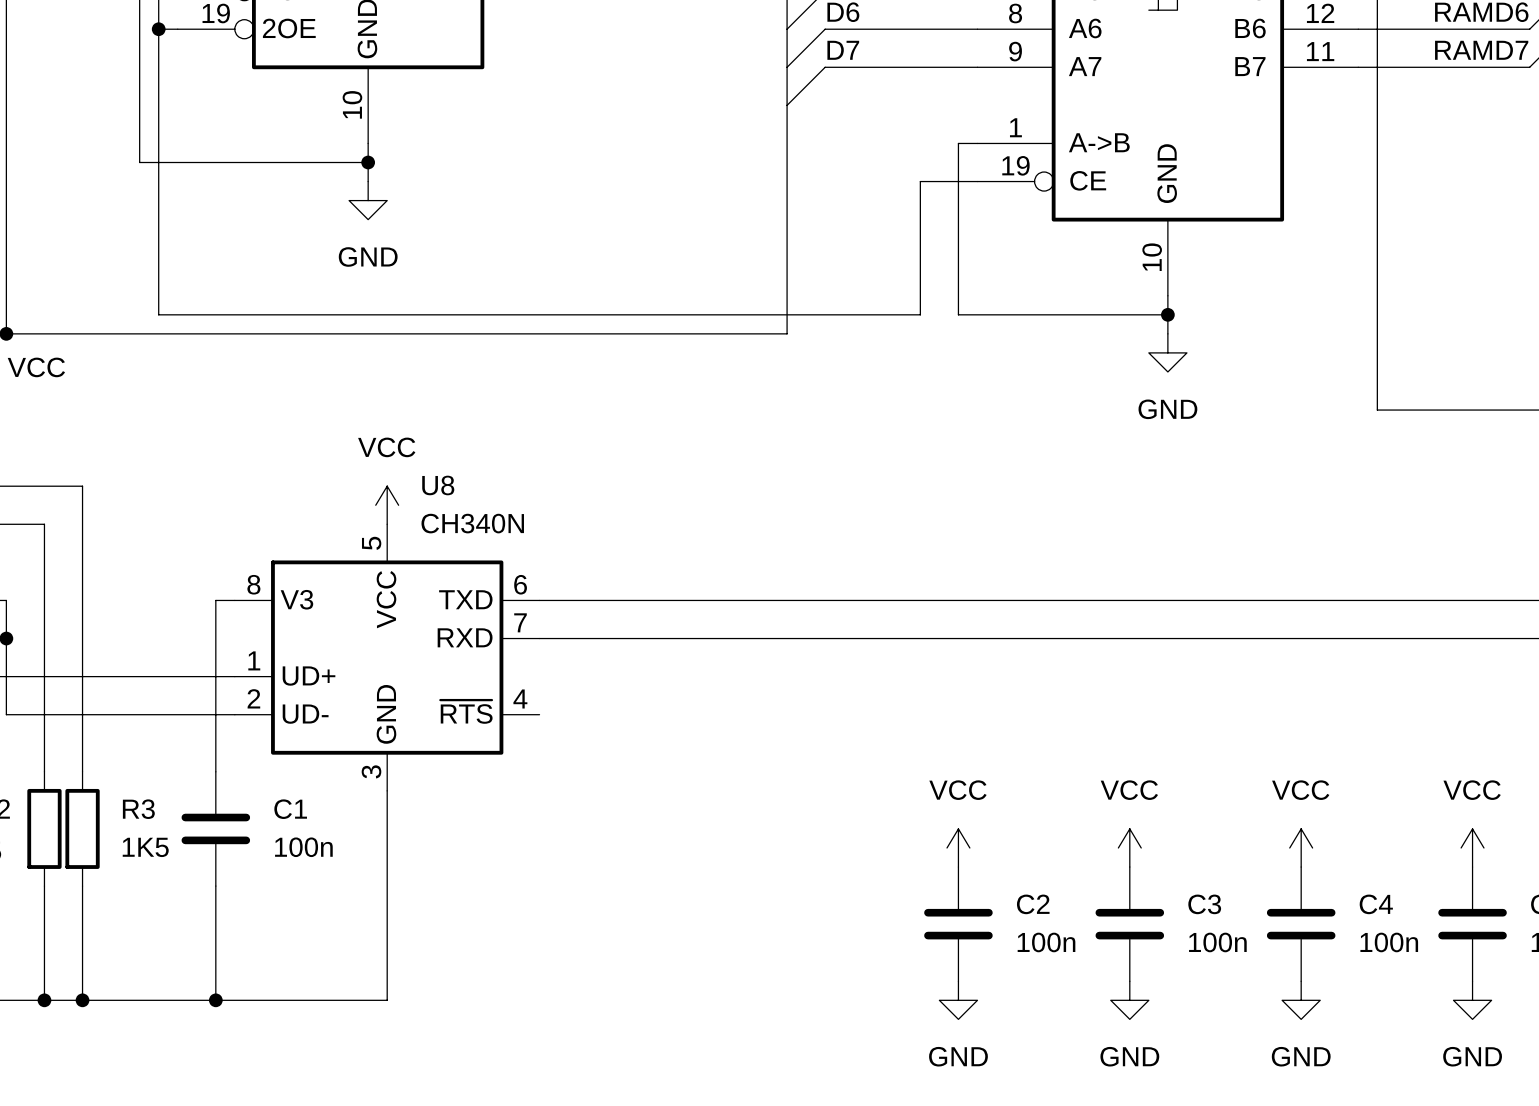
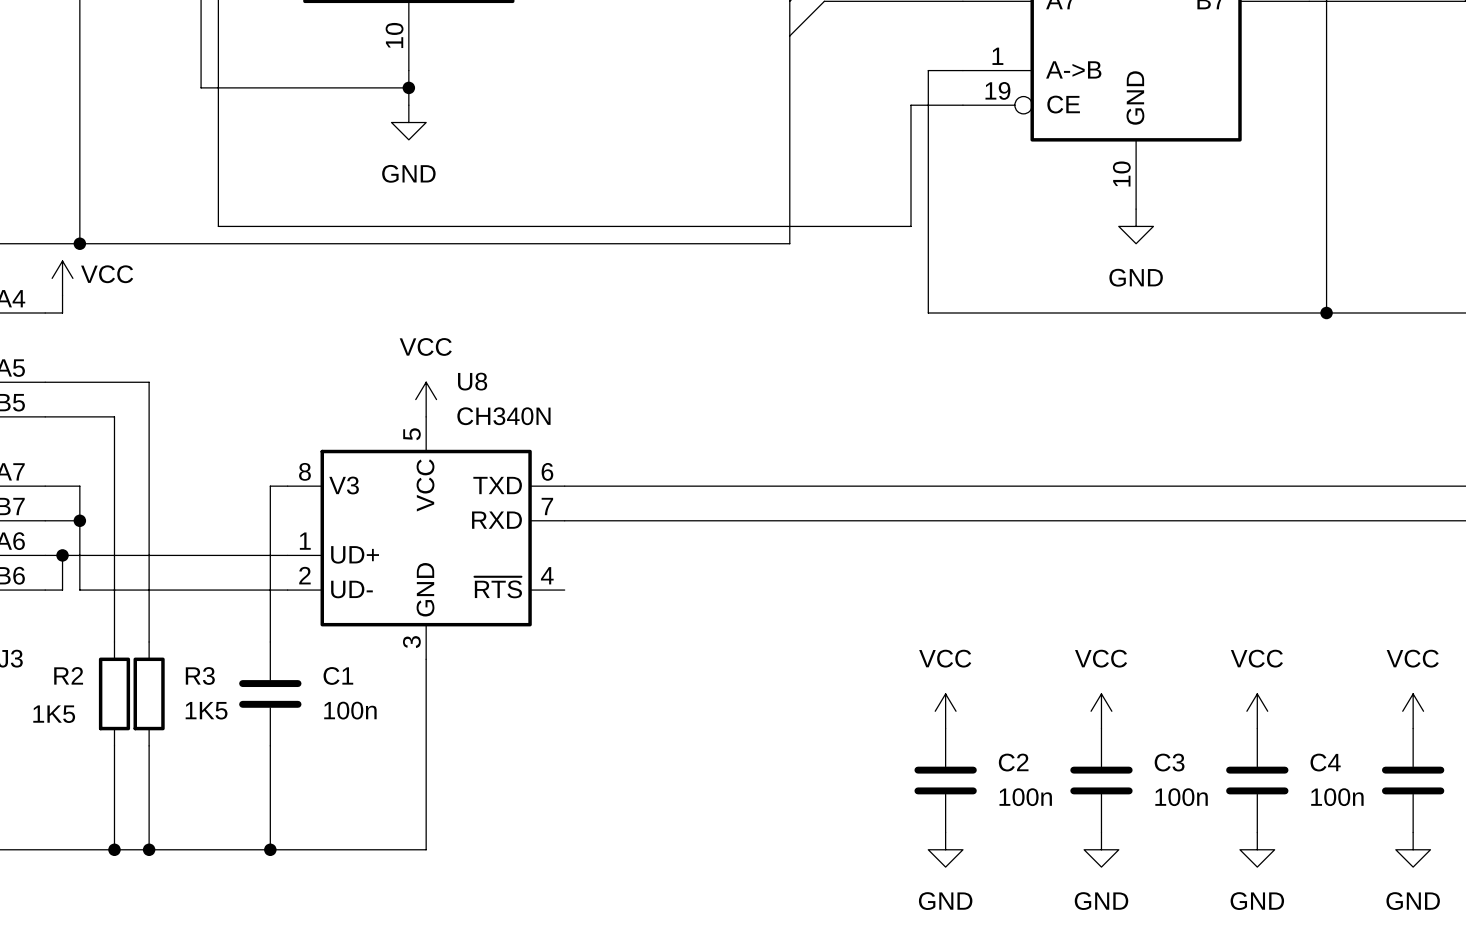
wire: (958, 143) (958, 314) (1167, 314) -> (945, 70) (928, 70) (928, 313) (1326, 313)
junction: (1167, 314) -> none
power symbol position: GND (1167, 352) -> GND (1136, 226)
junction: none -> (1326, 313)

